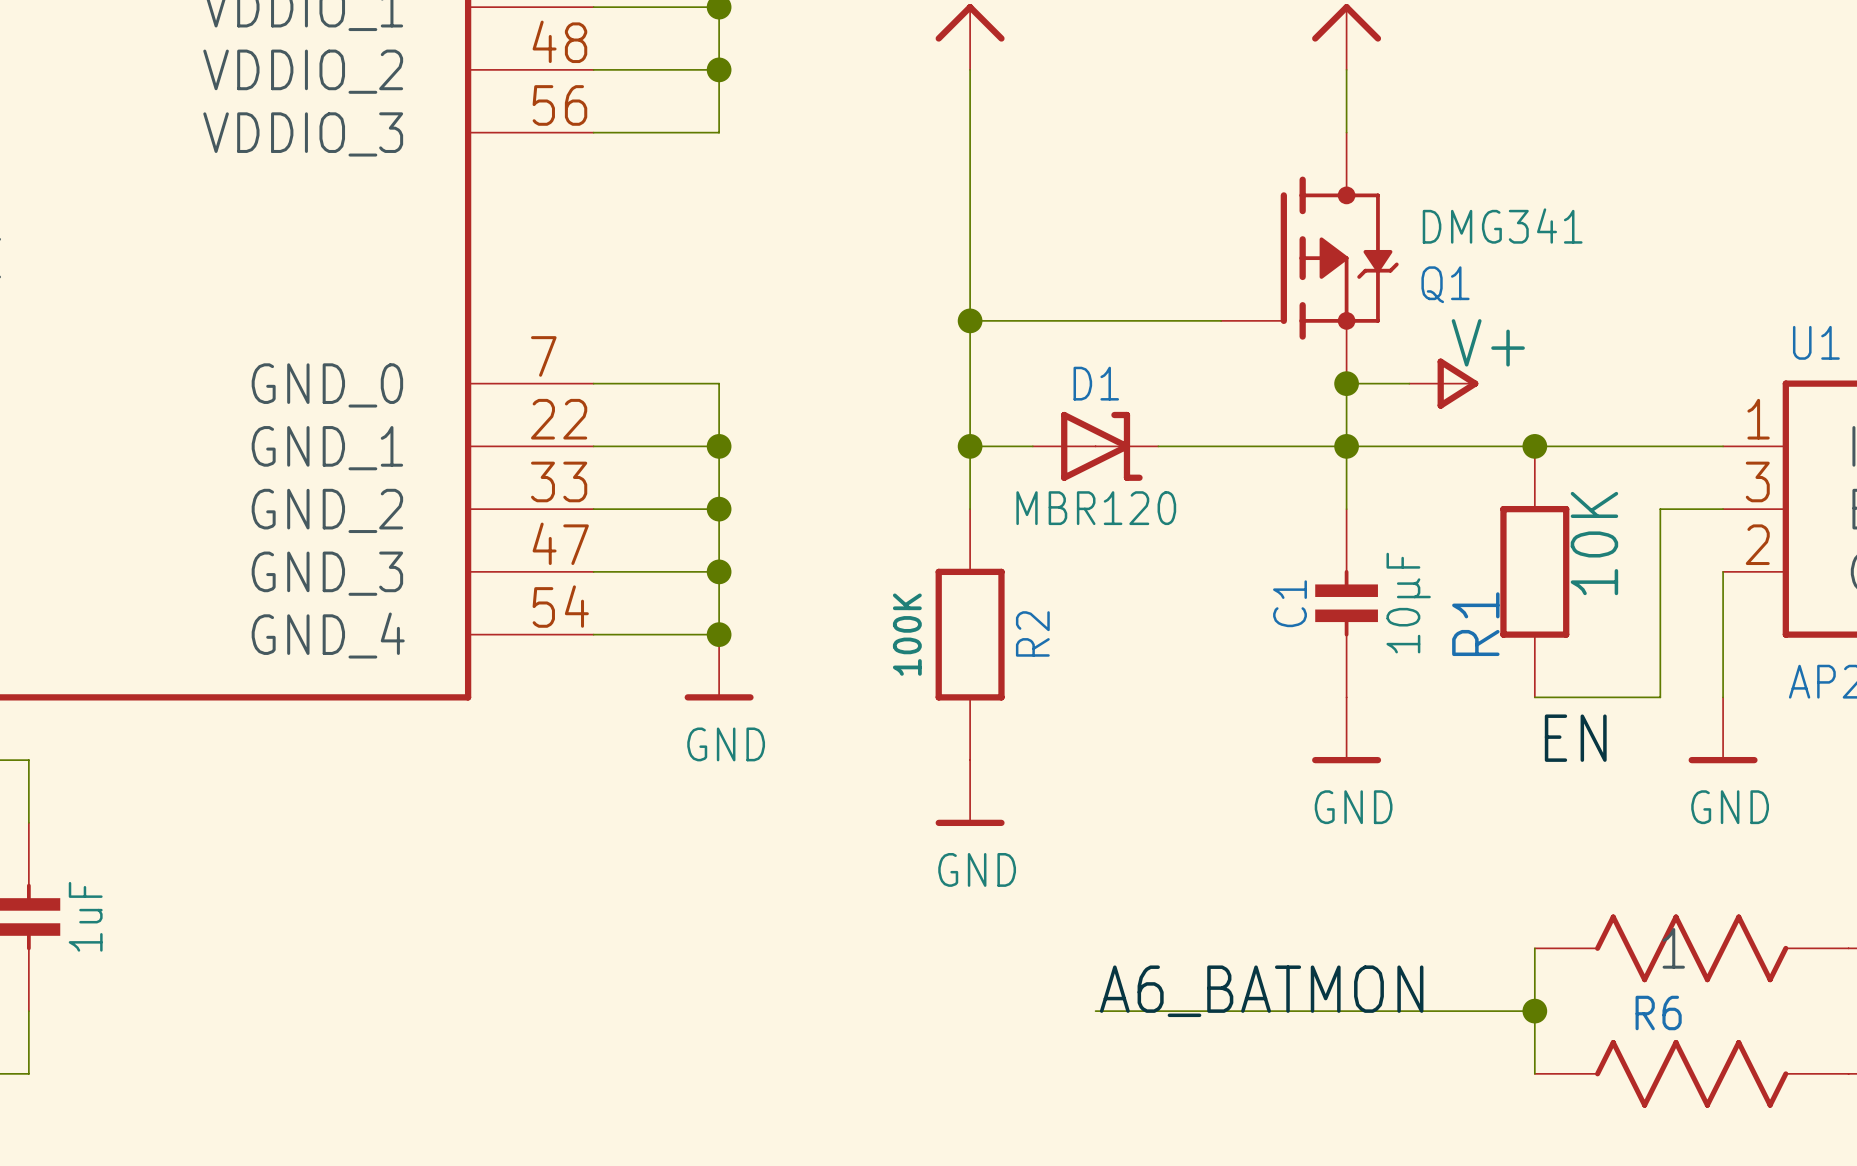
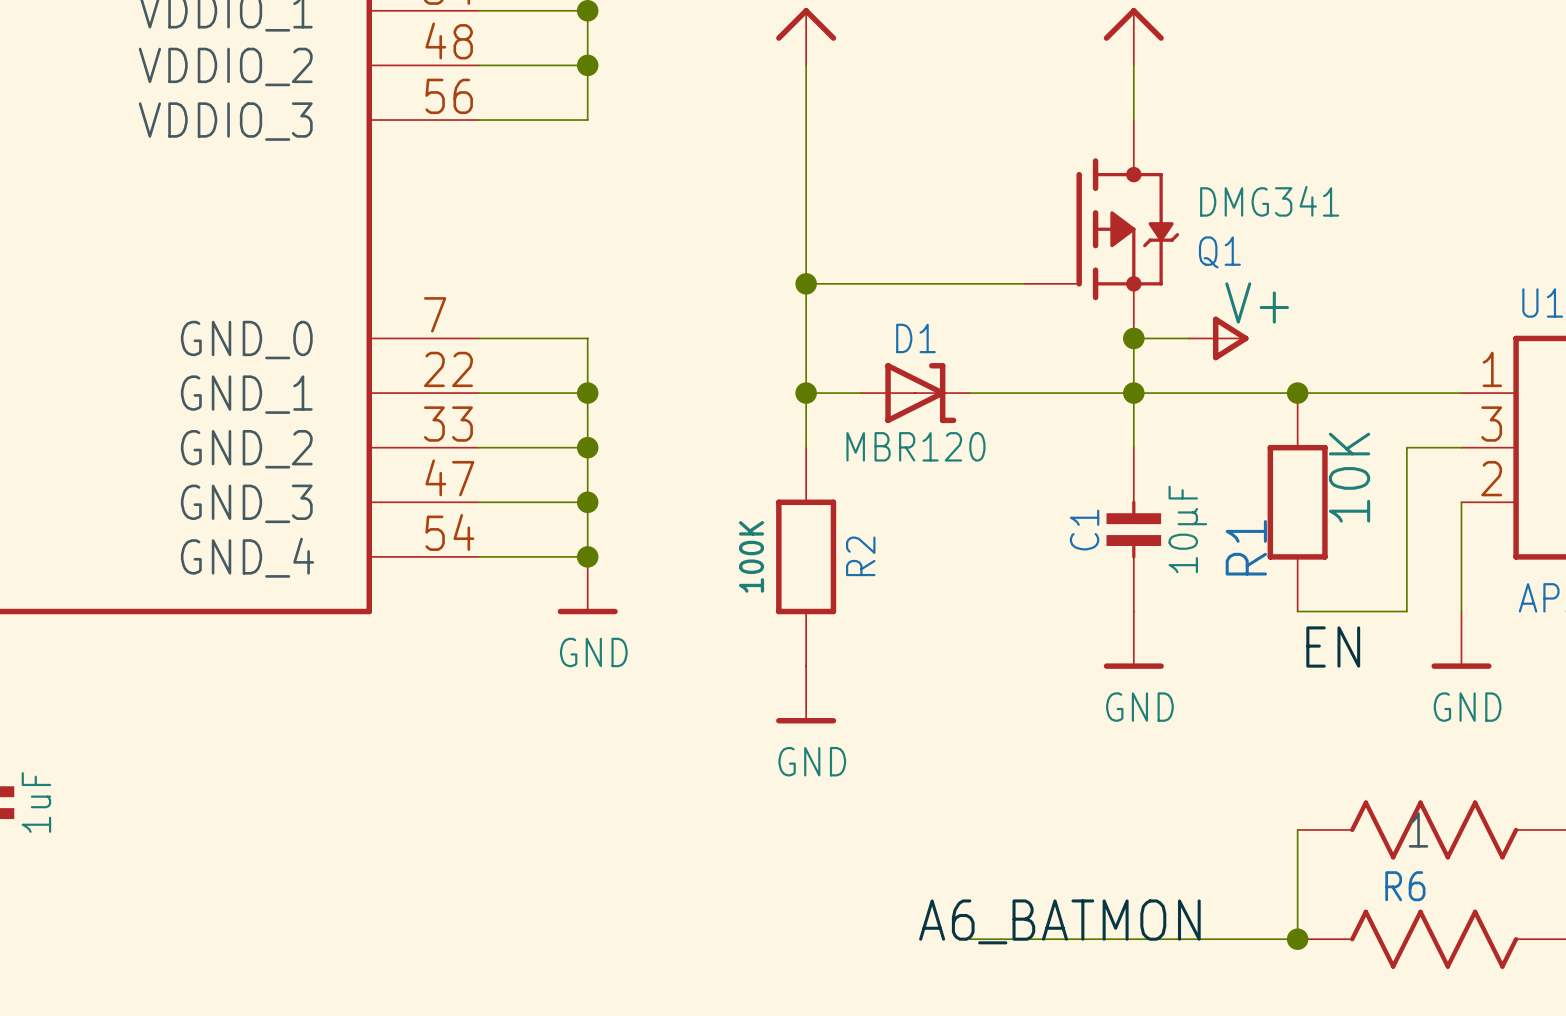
label position: A6_BATMON (1261, 991) -> A6_BATMON (1059, 921)
wire: (1095, 1011) (1534, 1011) -> none
junction position: (1534, 1011) -> (1297, 939)
wire: none -> (969, 939) (1297, 939)

